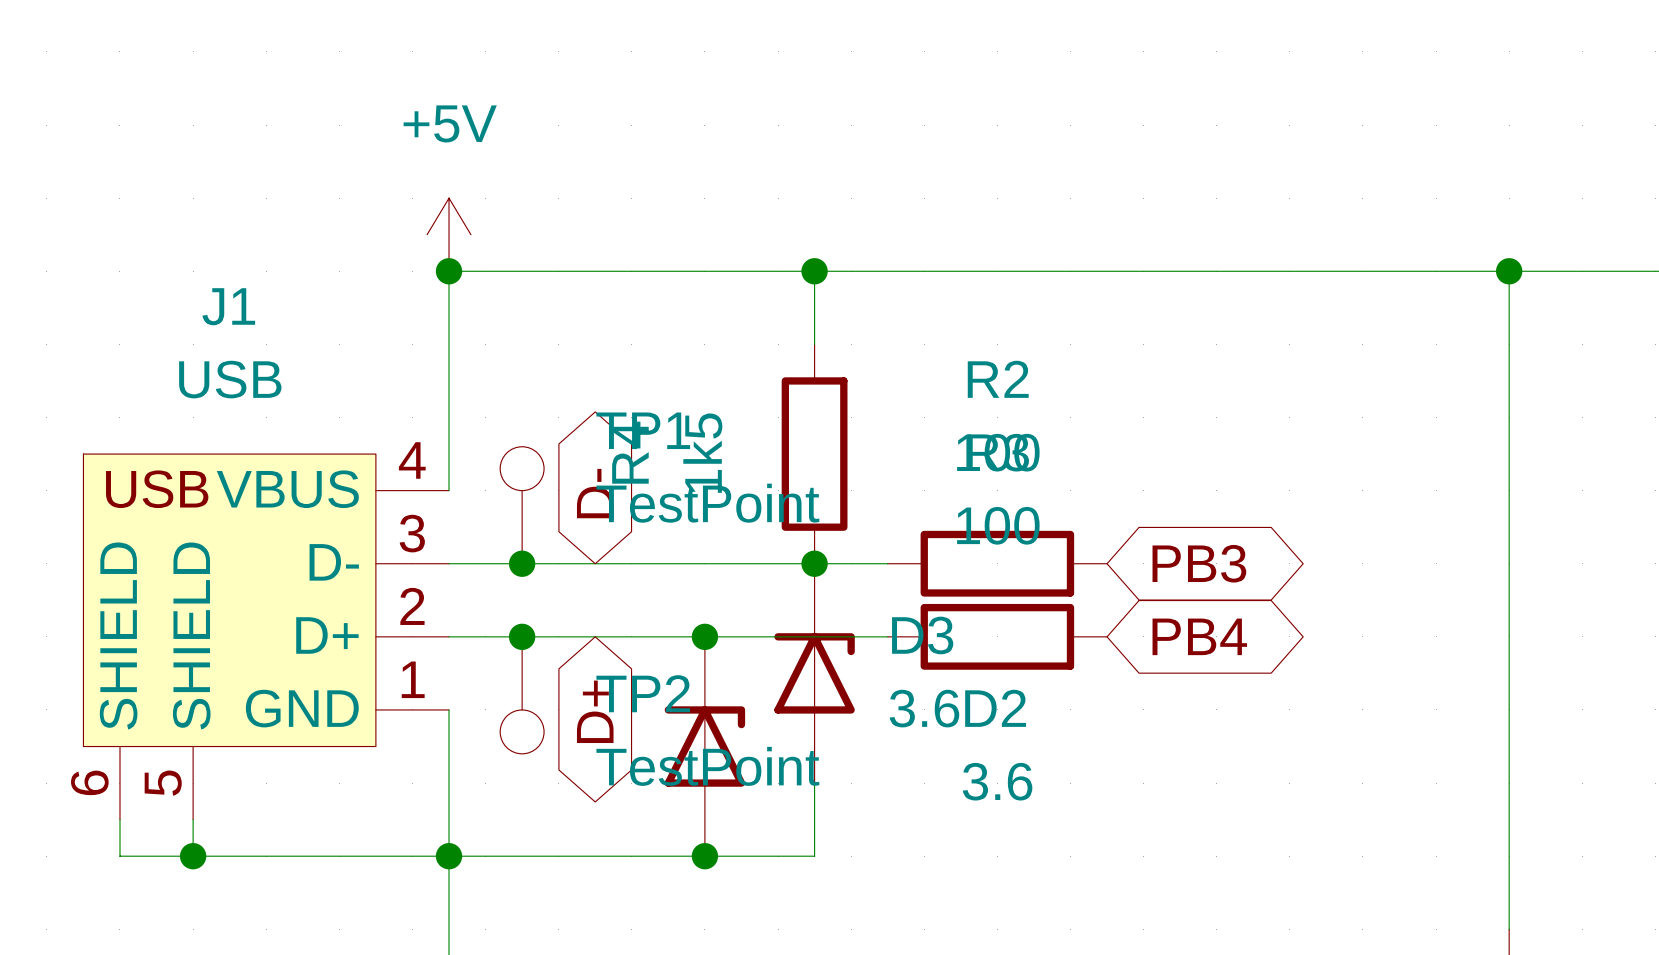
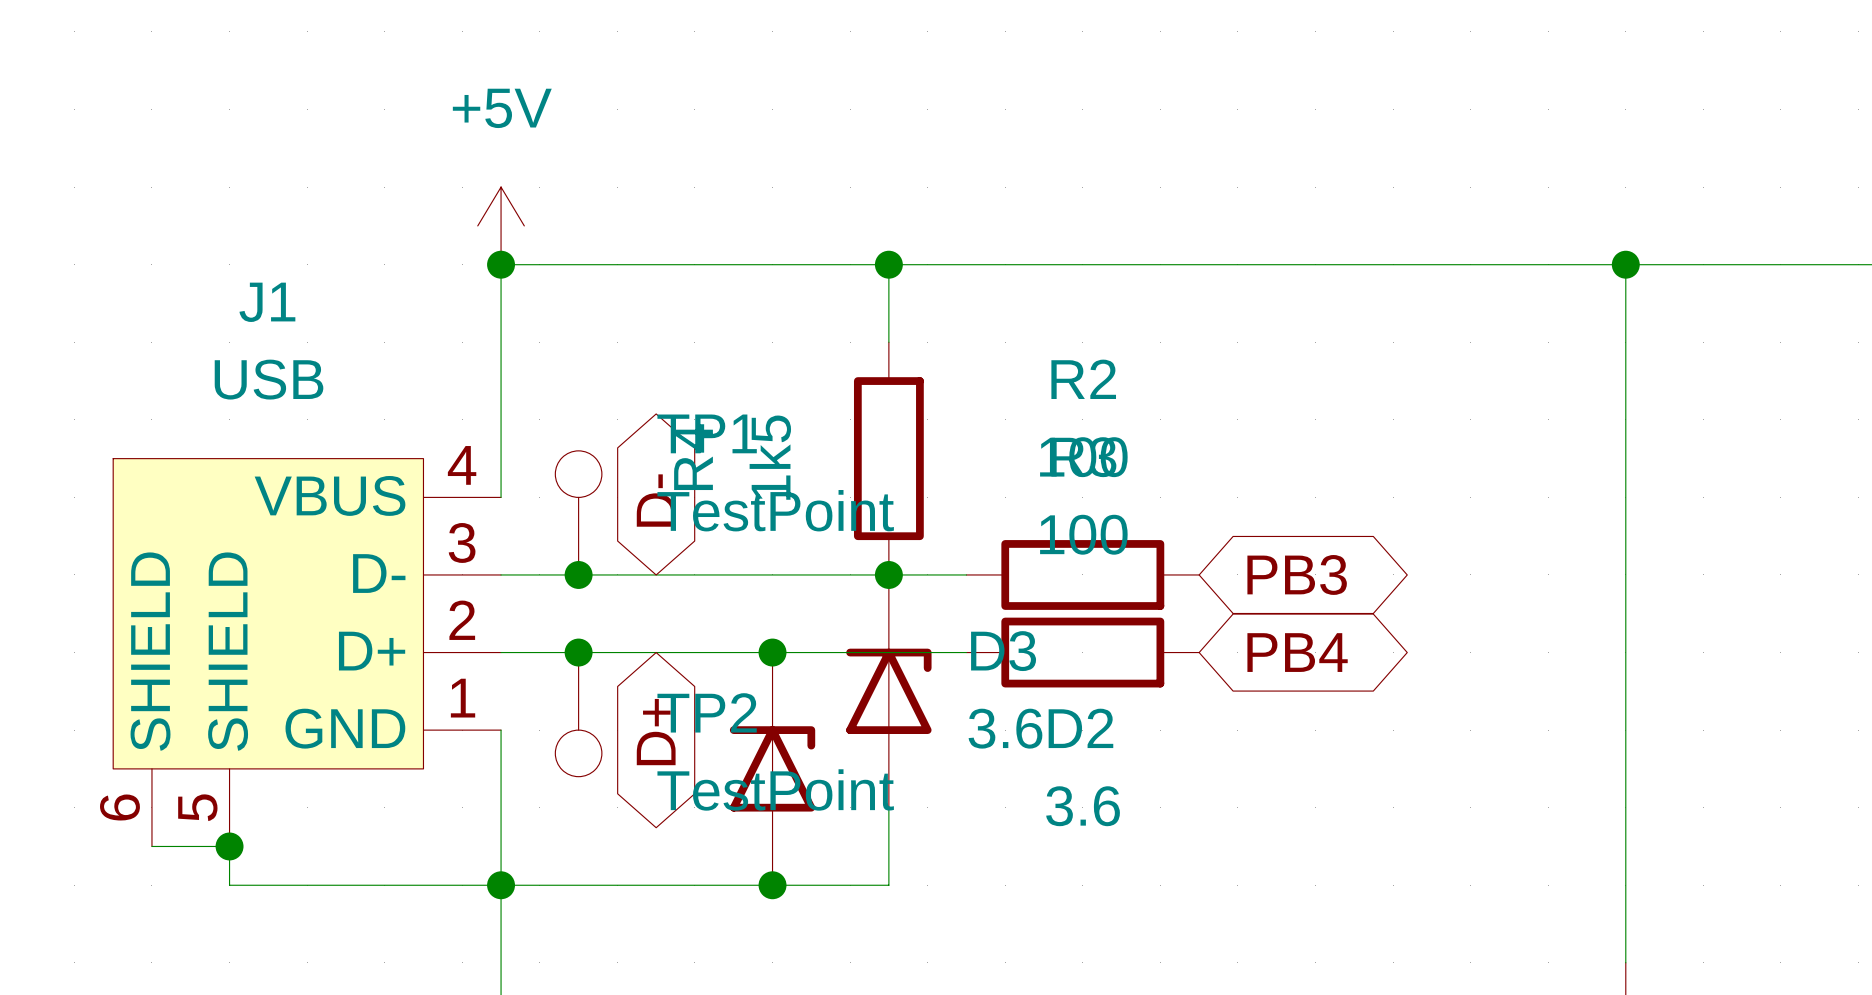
J1 text: USB (157, 489) -> none
wire: (119, 819) (119, 856) (193, 856) -> (151, 846) (229, 846)
junction position: (193, 856) -> (229, 846)

